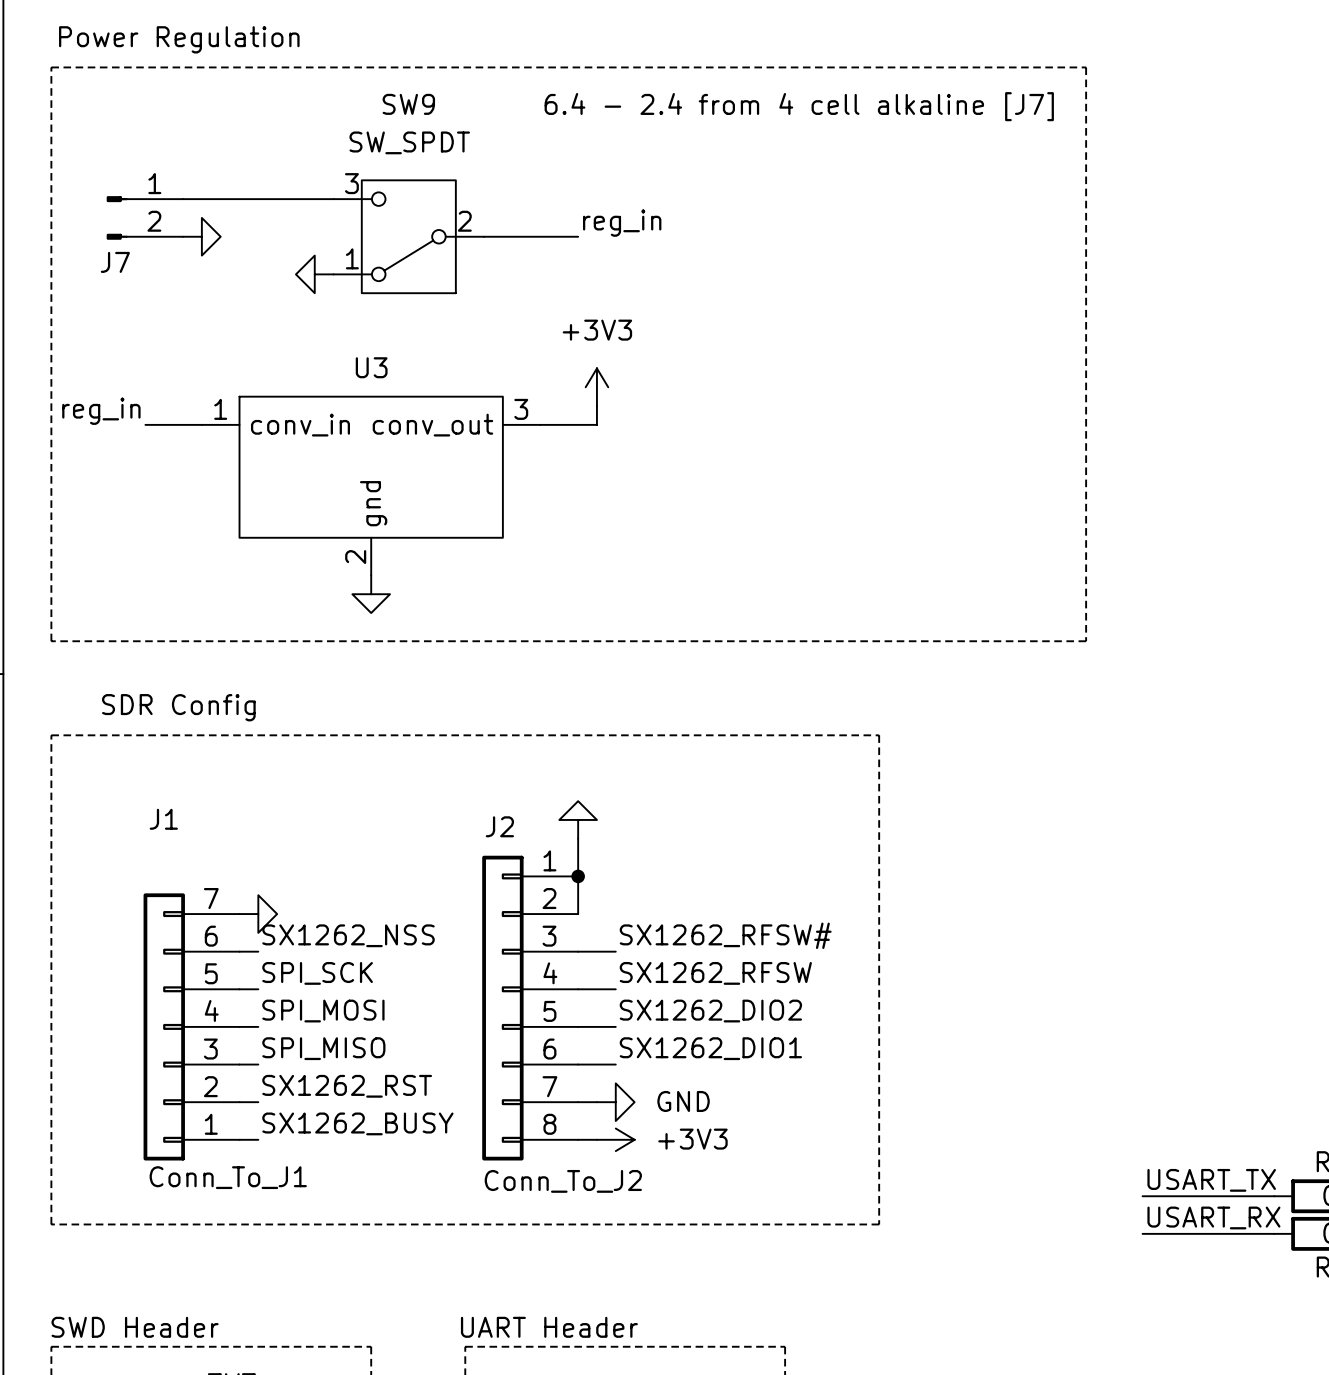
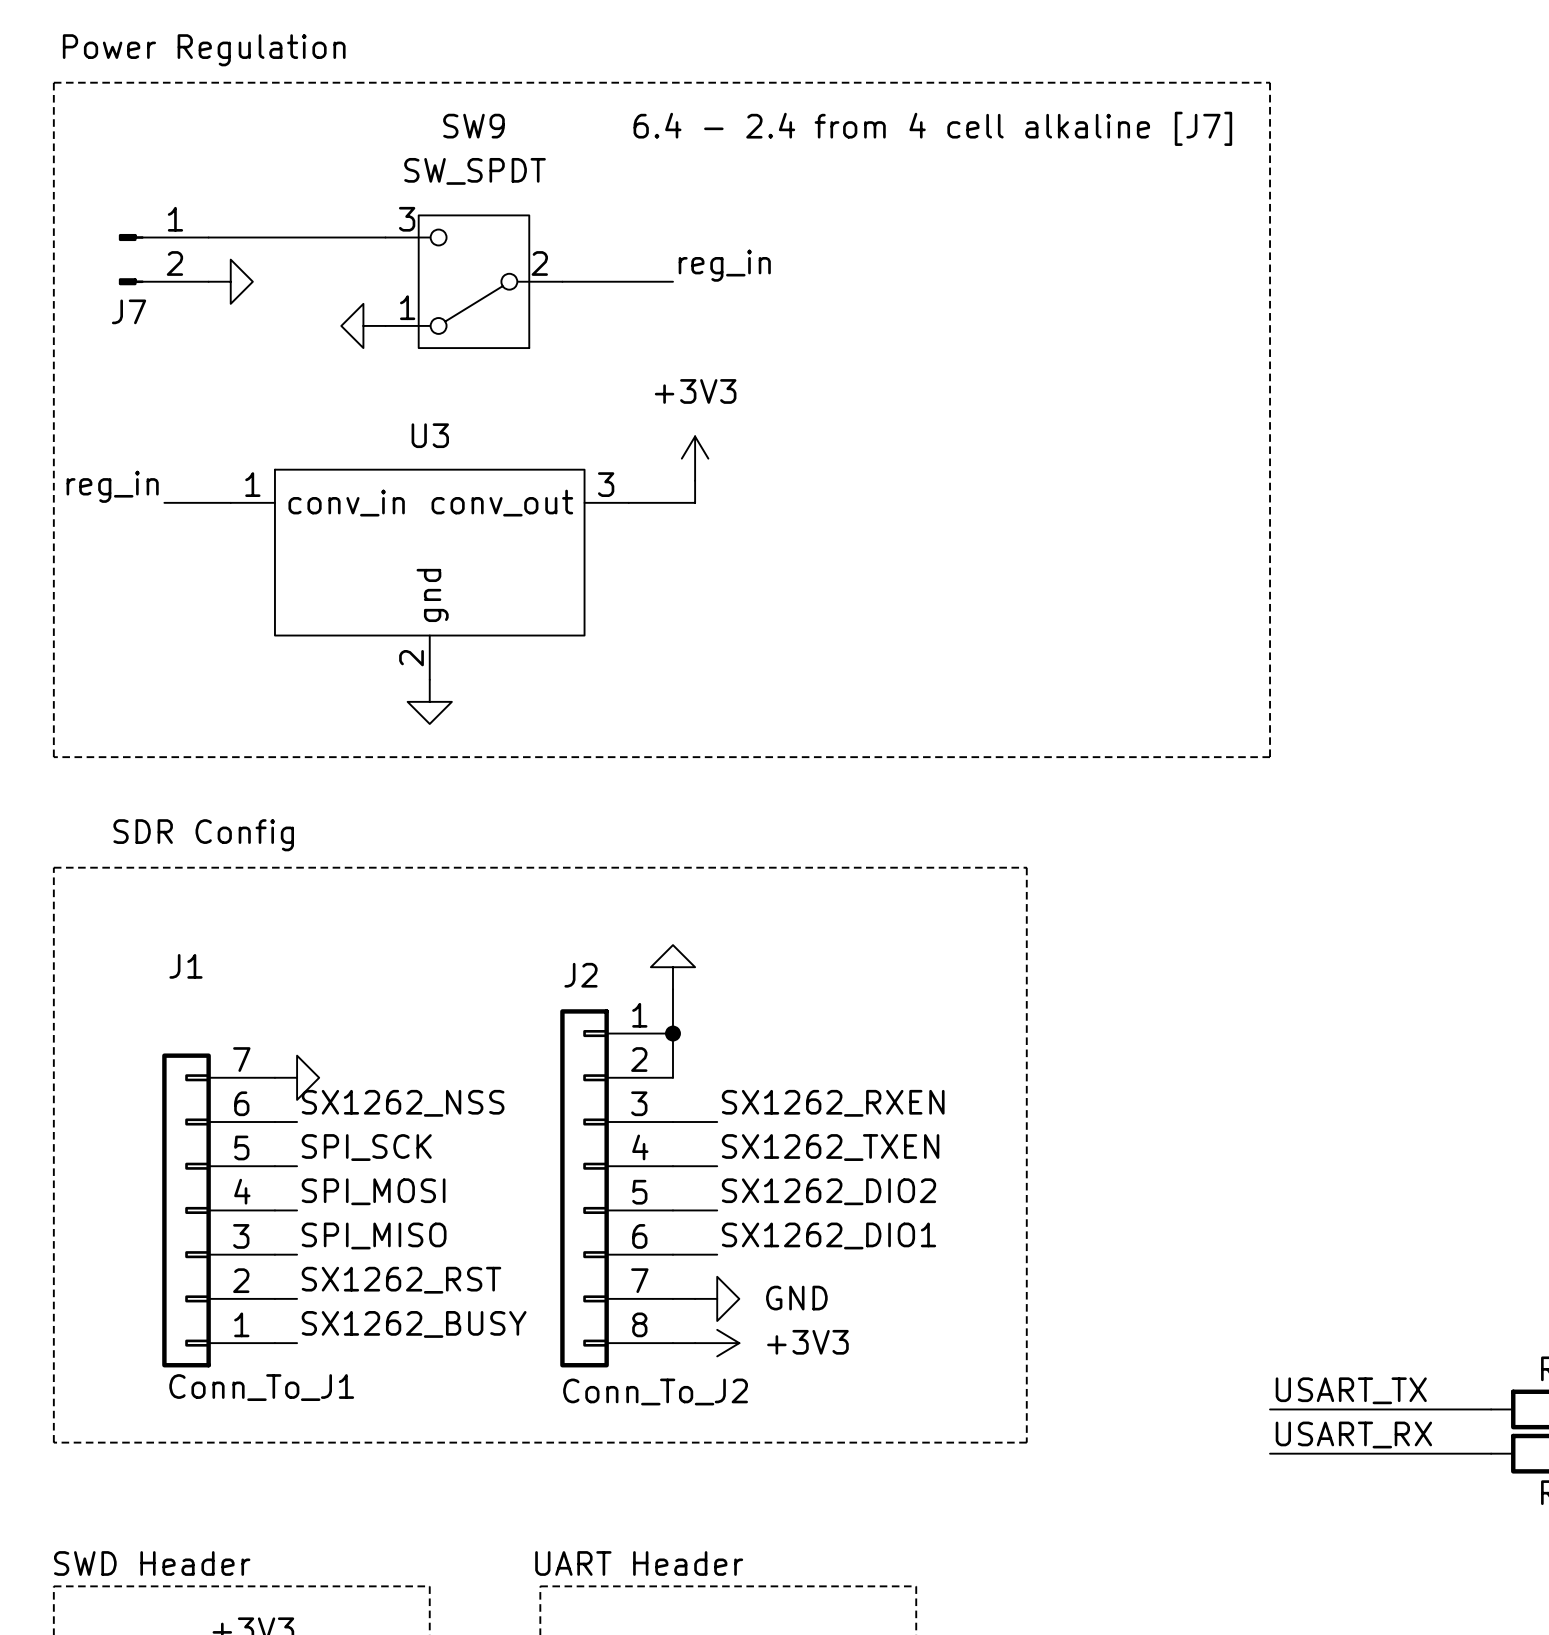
label: SX1262_RFSW# (725, 935) -> SX1262_RXEN (833, 1103)
label: SX1262_RFSW (715, 973) -> SX1262_TXEN (830, 1147)
label position: USART_TX (1211, 1180) -> USART_TX (1351, 1390)
wire: none -> (1270, 1409) (1336, 1409)
label position: USART_RX (1213, 1217) -> USART_RX (1353, 1435)
wire: none -> (1270, 1453) (1336, 1453)

